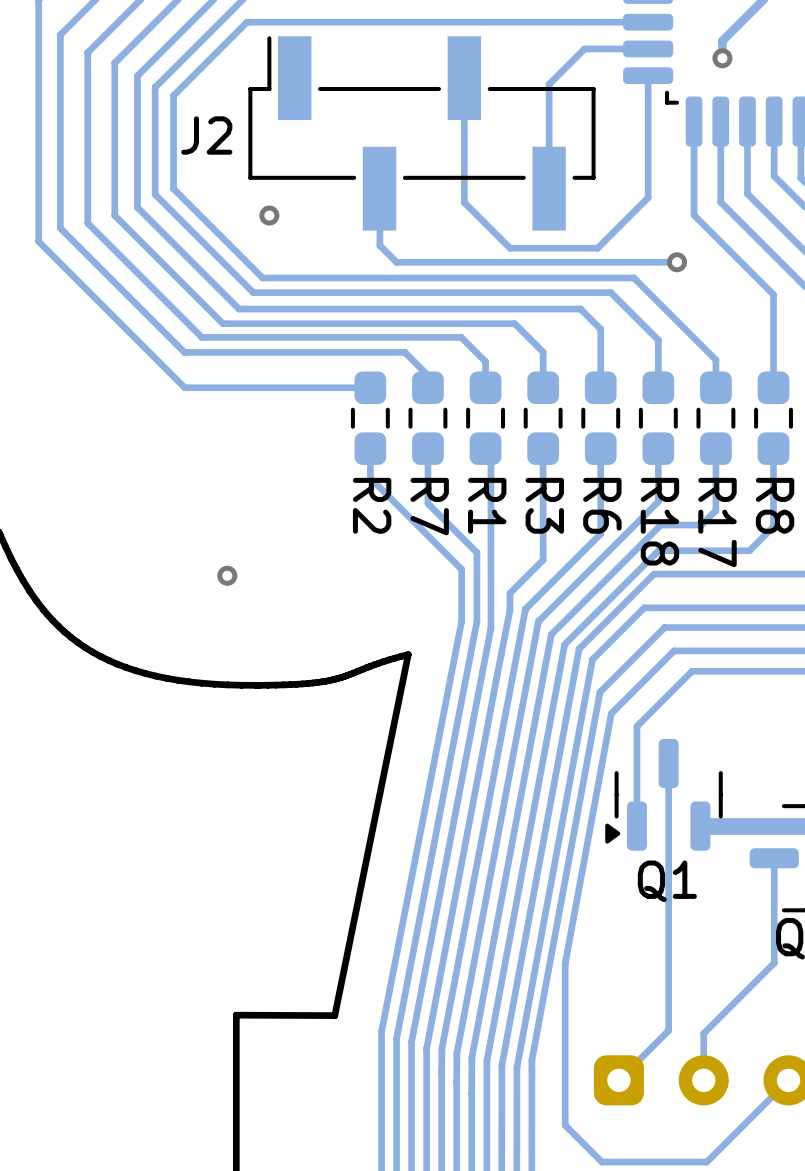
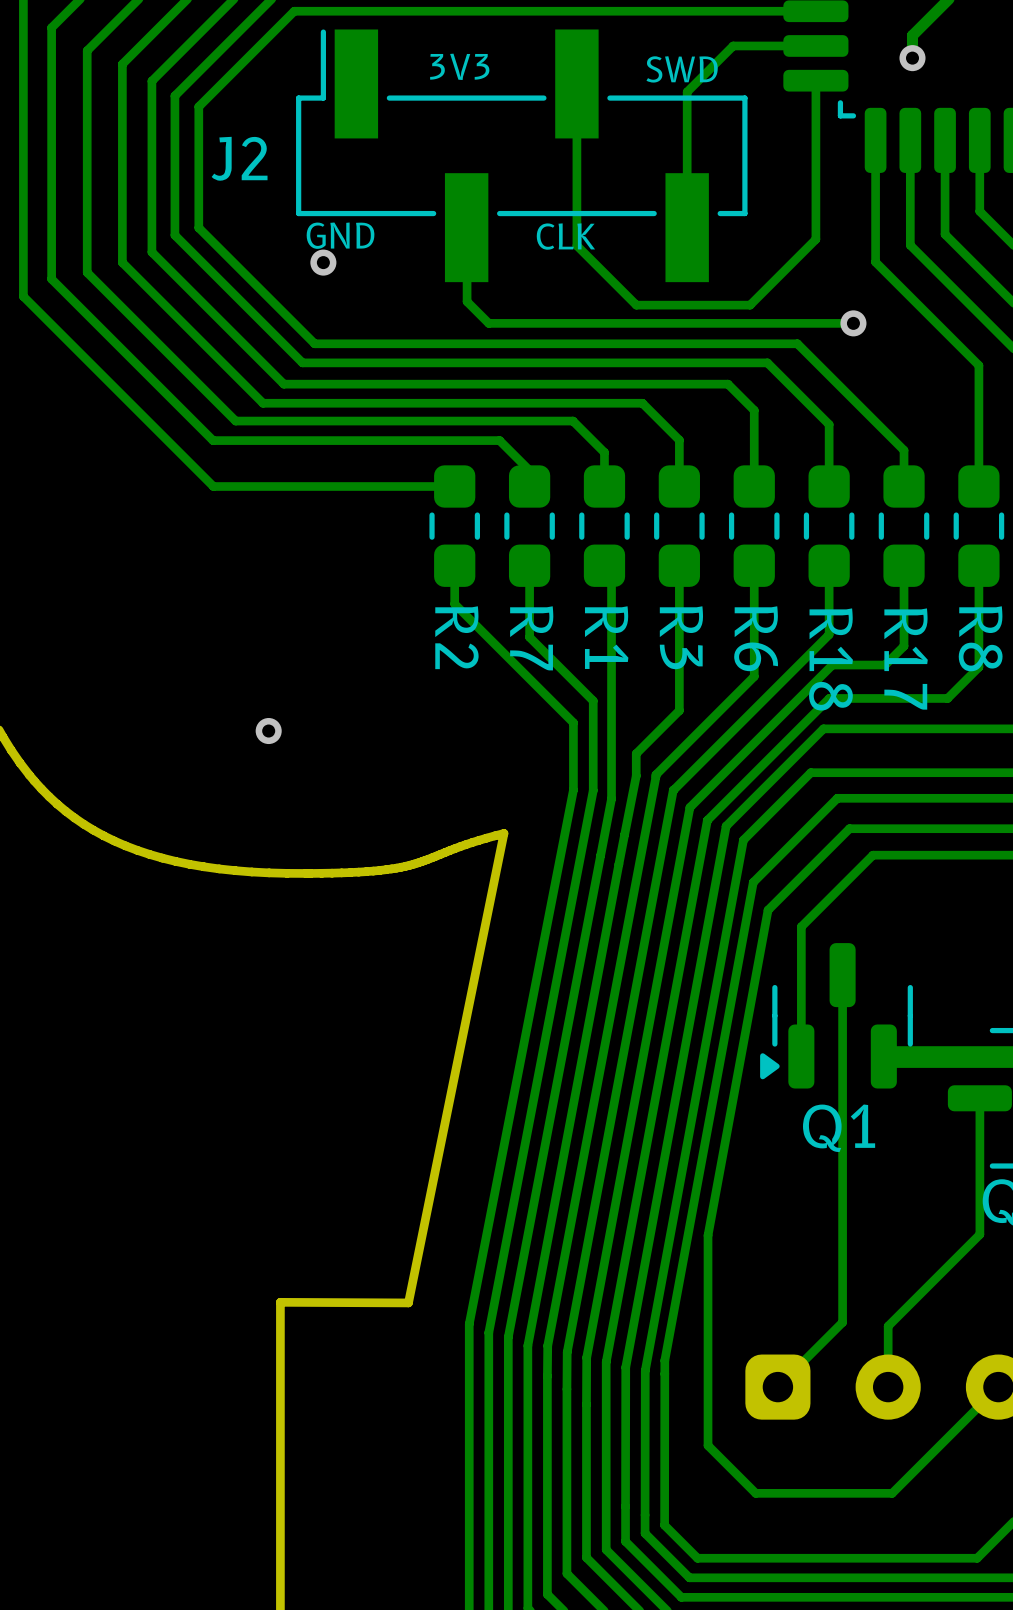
text: none -> 3V3 (459, 66)
text: none -> SWD (682, 69)
text: none -> GND (340, 235)
text: none -> CLK (565, 236)

